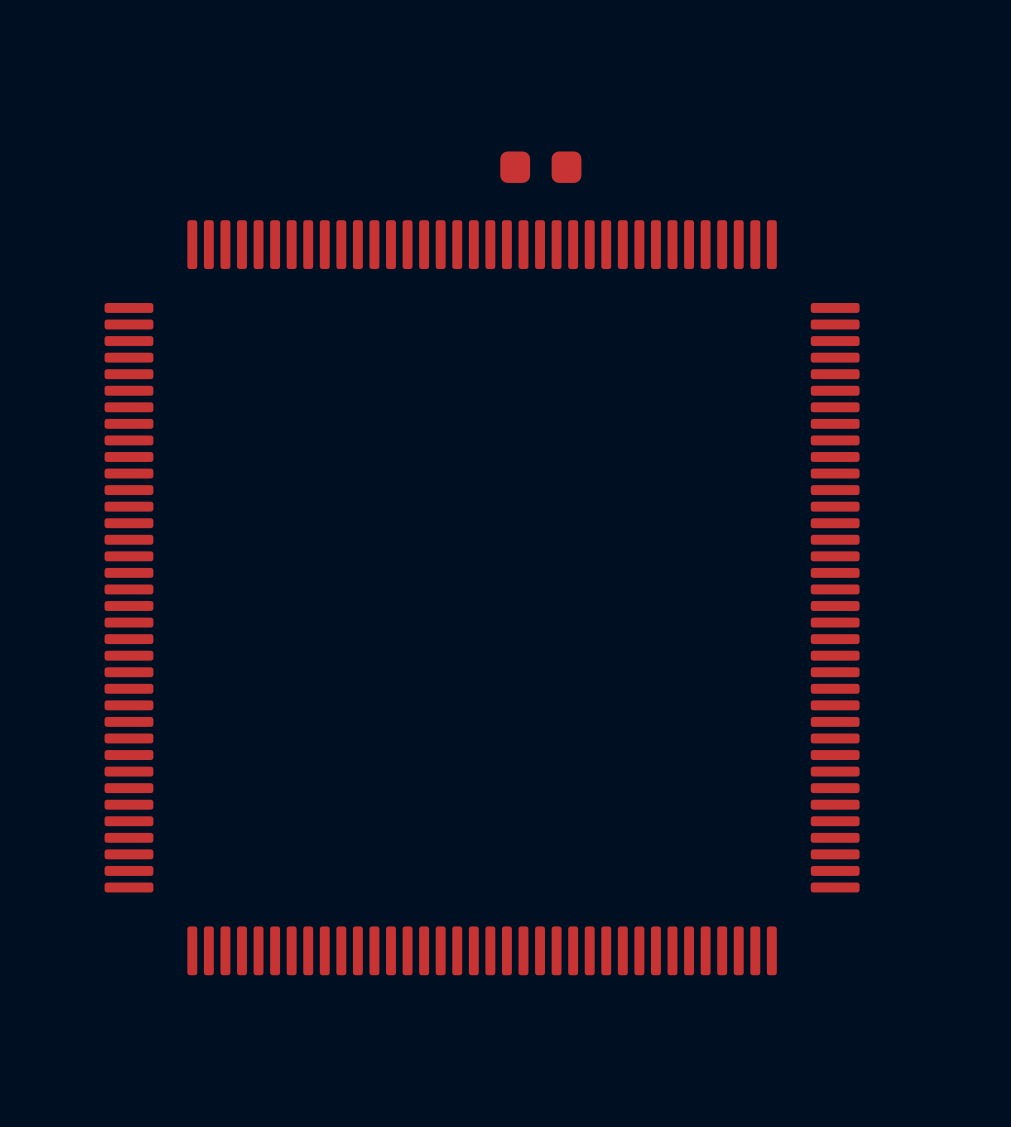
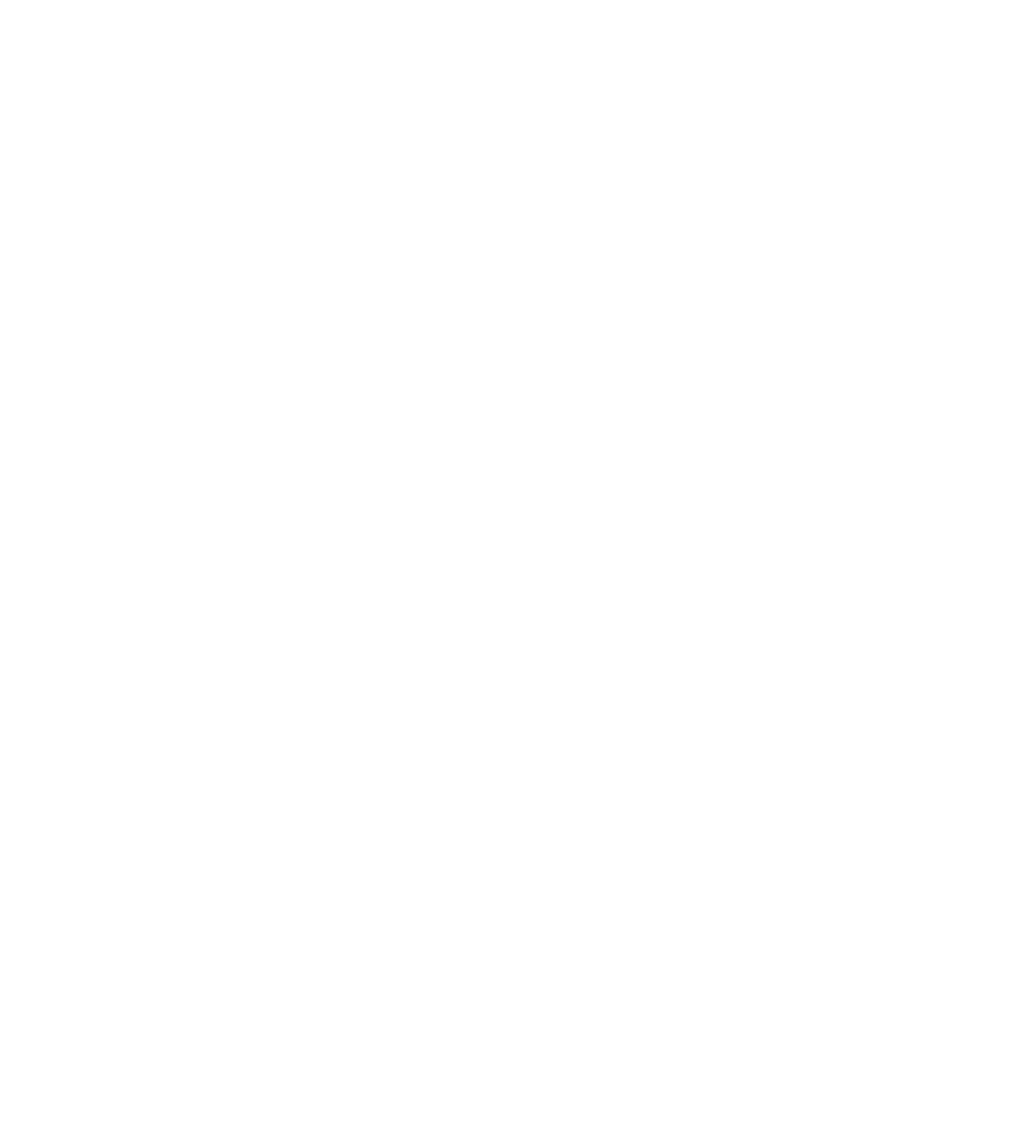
part: (540, 167) -> none
part: (482, 597) -> none

